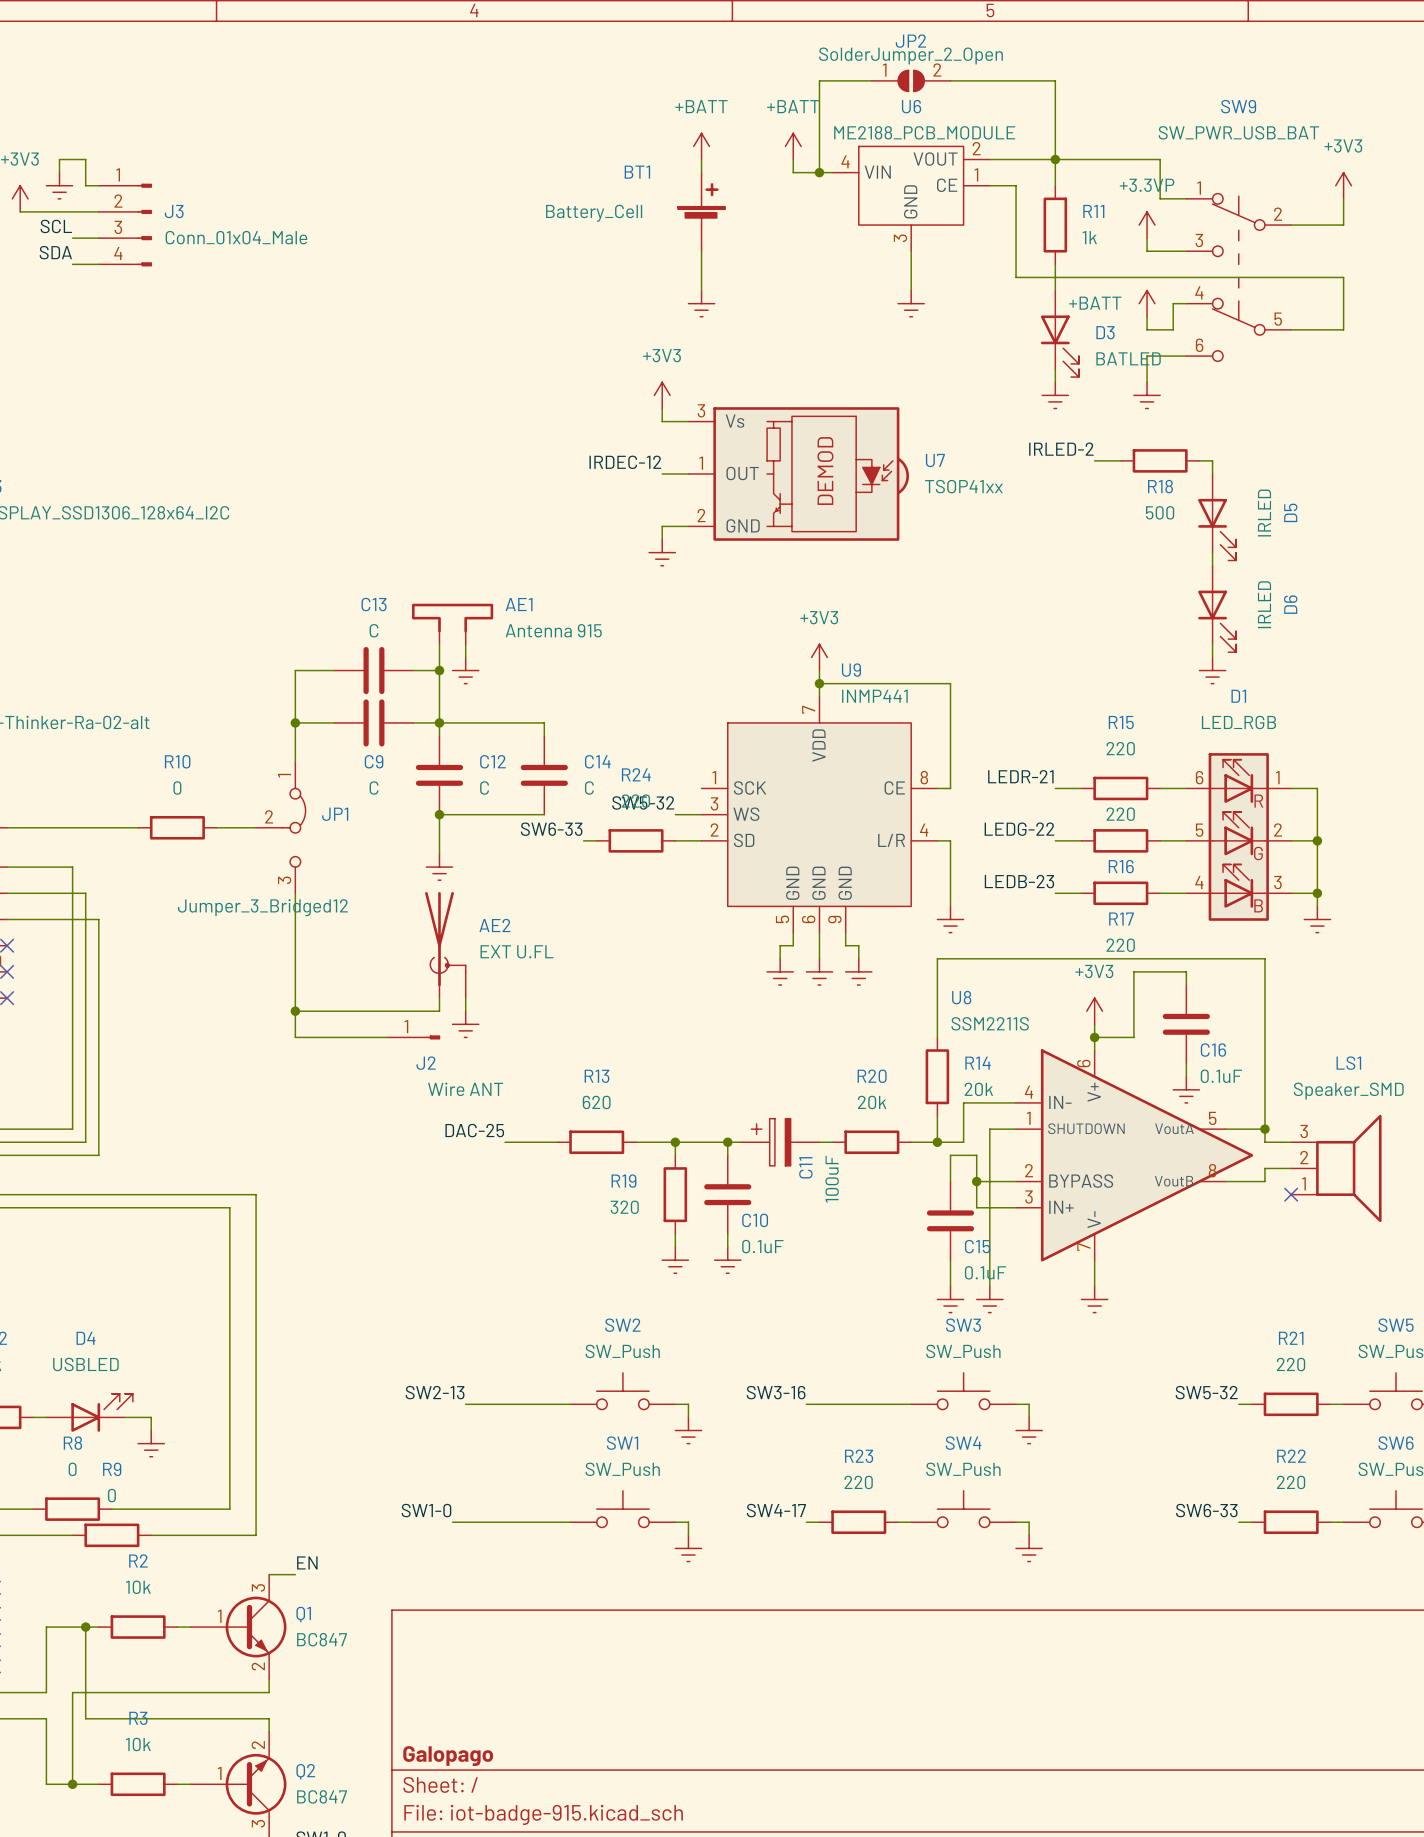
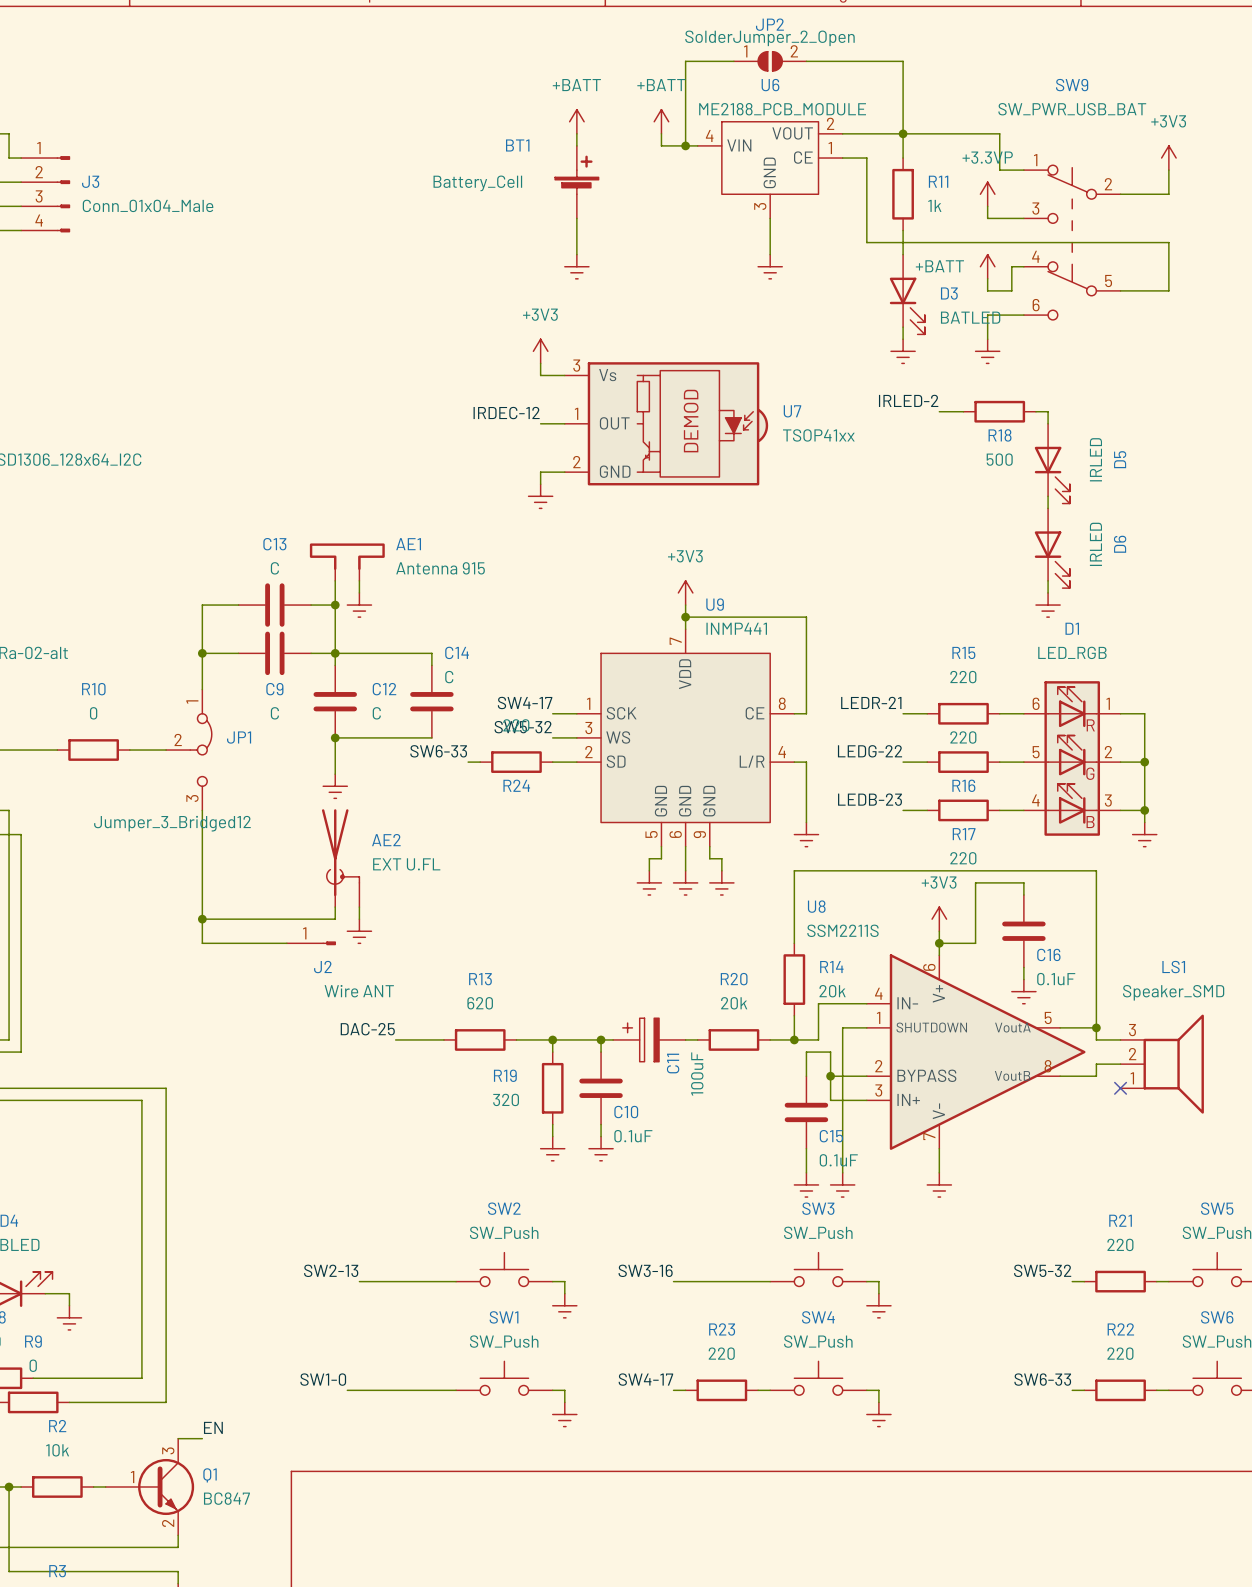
C14 name position: C14 (597, 761) -> C14 (457, 652)
R24 name position: R24 (636, 774) -> R24 (516, 785)
label: none -> SW4-17 (525, 702)
C14 value position: C (589, 787) -> C (449, 677)
wire: none -> (552, 713) (576, 713)

